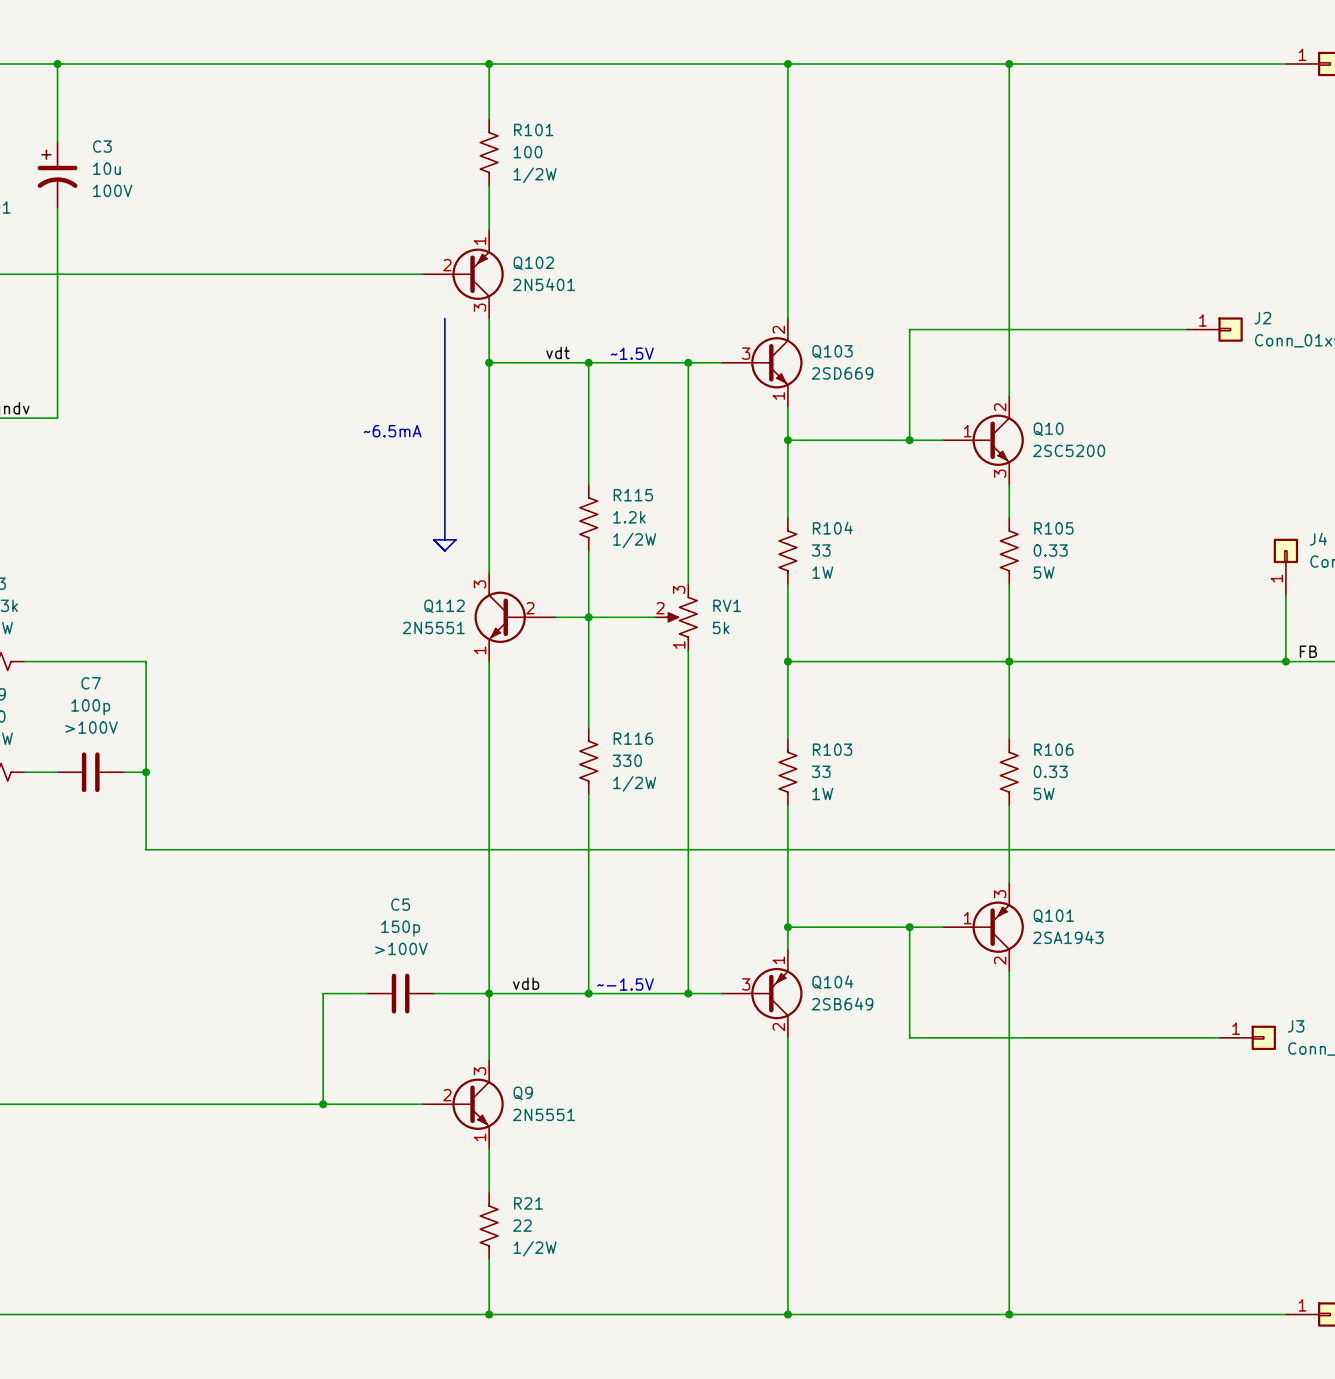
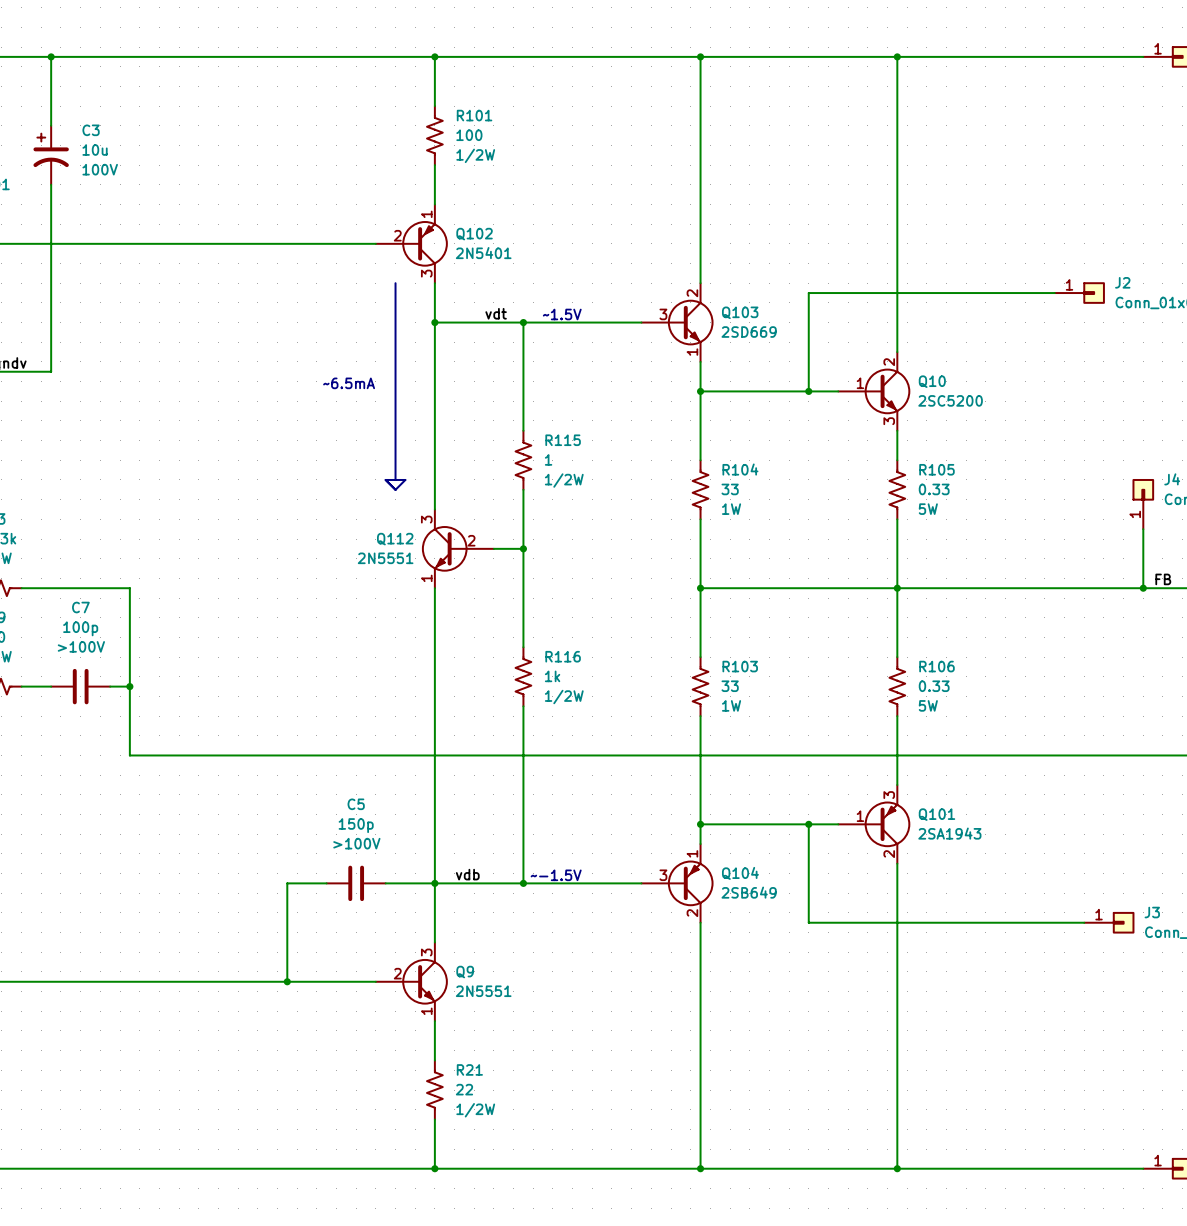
wire: (688, 362) (688, 584) -> none
junction: (688, 362) -> none
R115 value: 1.2k (629, 517) -> 1 (548, 459)
wire: (588, 617) (655, 617) -> none
RV1: 5k (676, 617) -> none
wire: (688, 650) (688, 993) -> none
R116 value: 330 (627, 760) -> 1k (552, 676)
junction: (688, 993) -> none

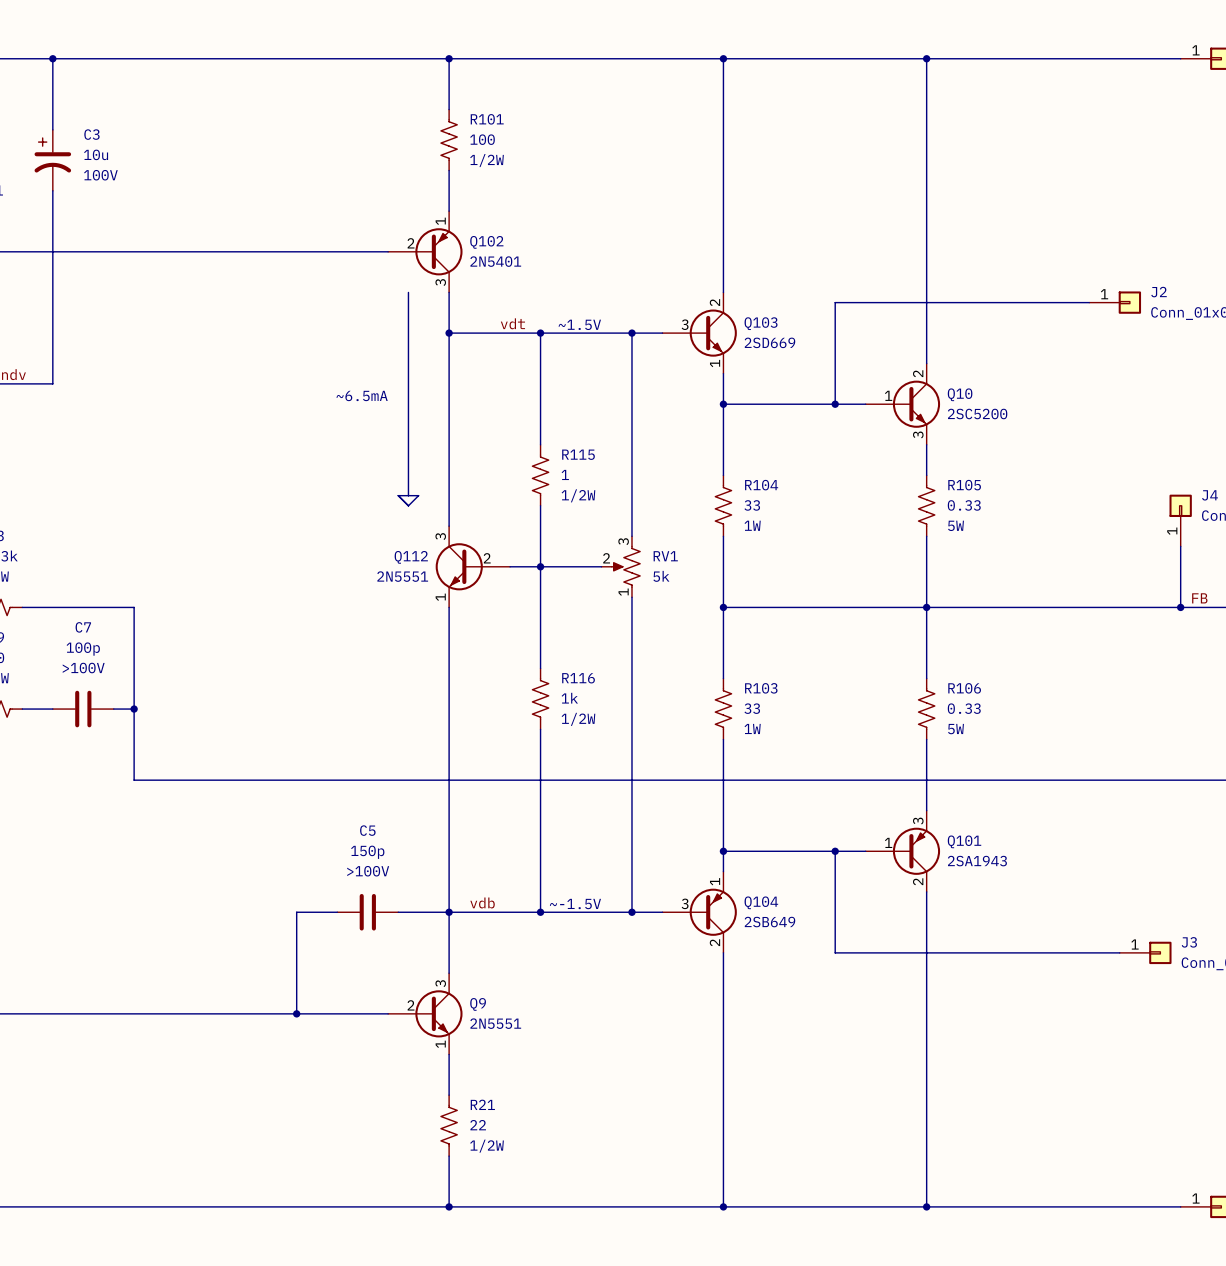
wire: none -> (631, 333) (631, 536)
junction: none -> (631, 333)
wire: none -> (540, 566) (601, 566)
RV1: none -> 5k (620, 566)
wire: none -> (631, 597) (631, 912)
junction: none -> (631, 912)

